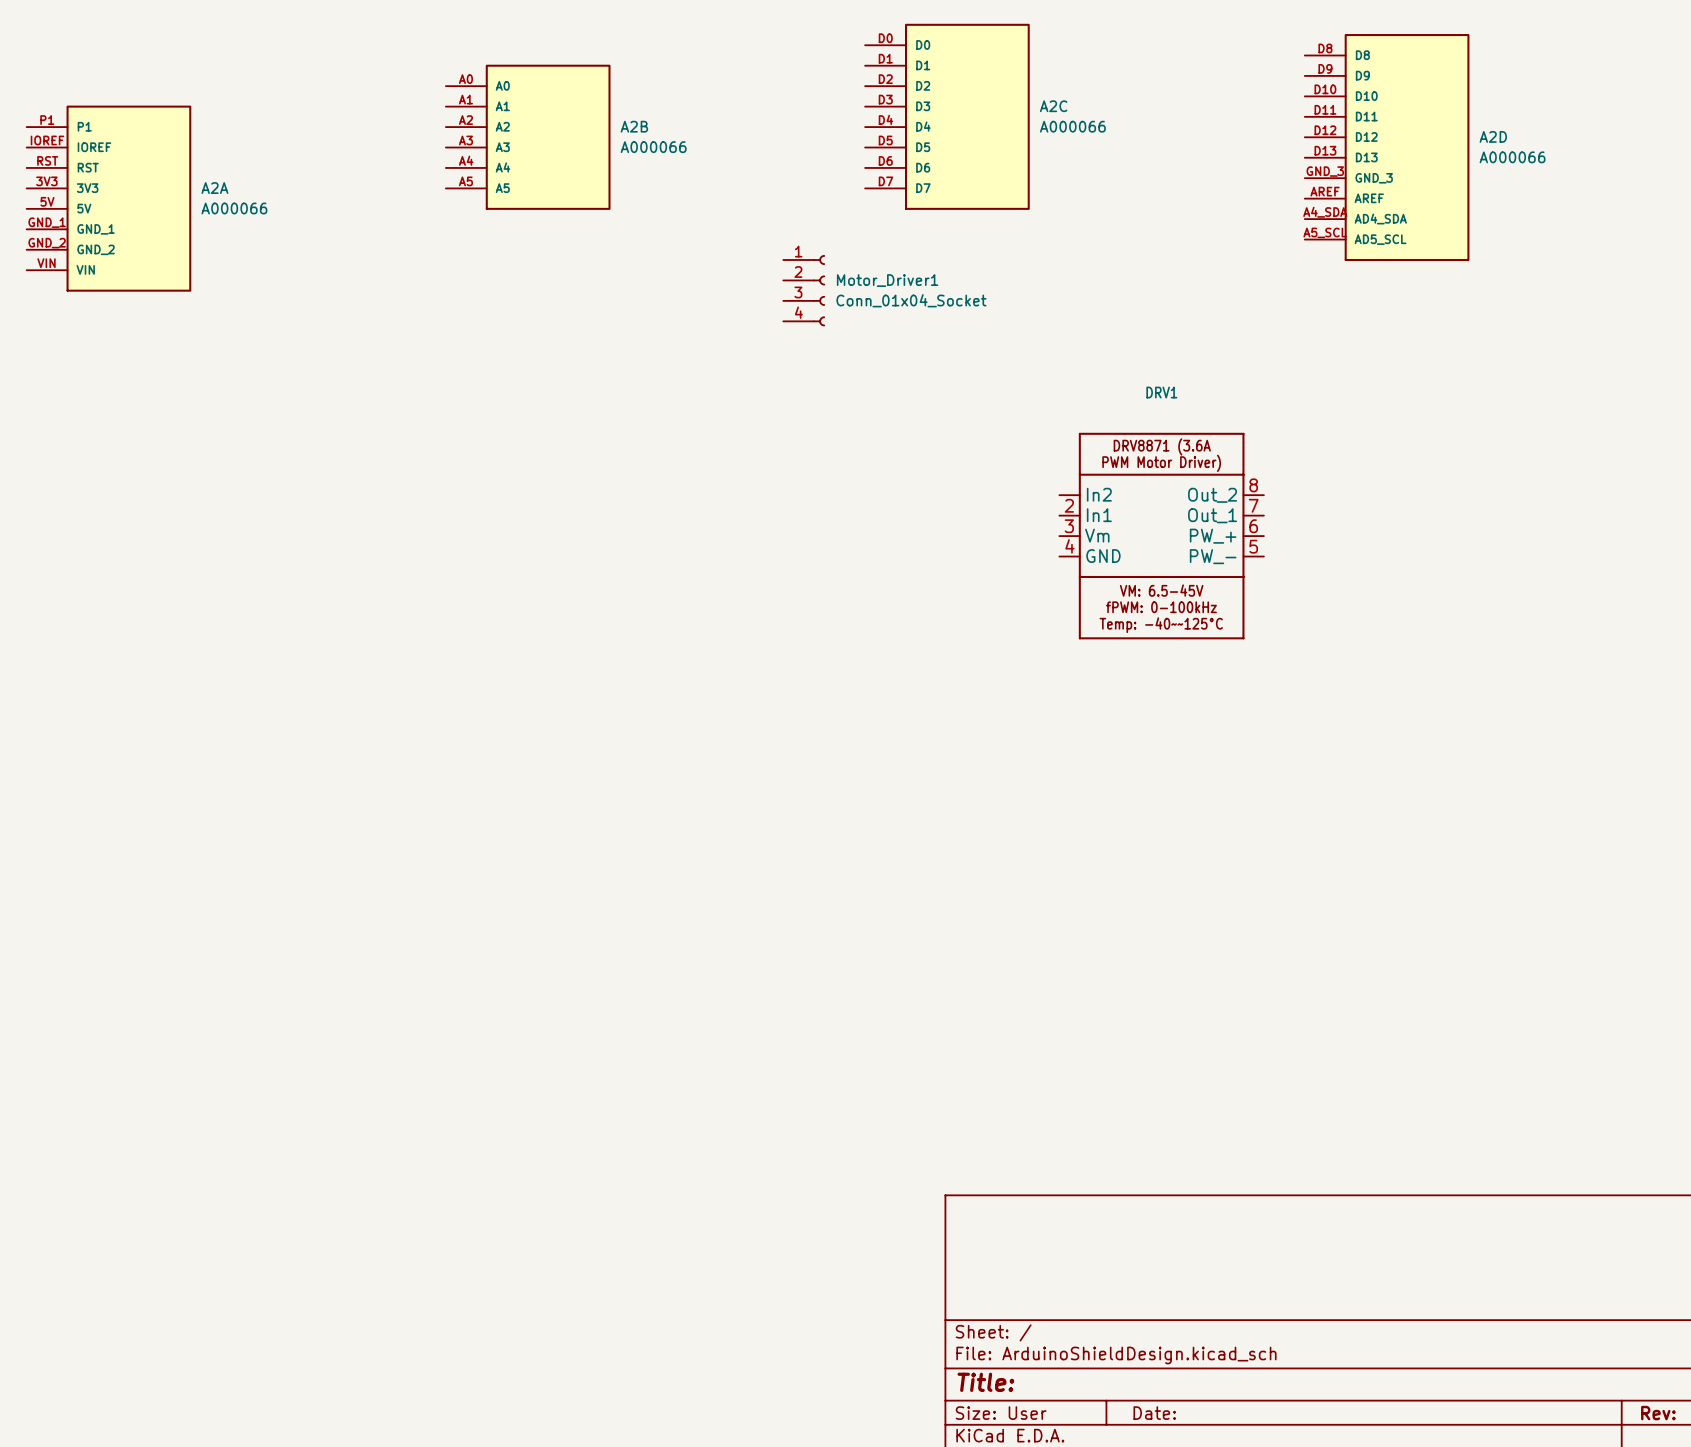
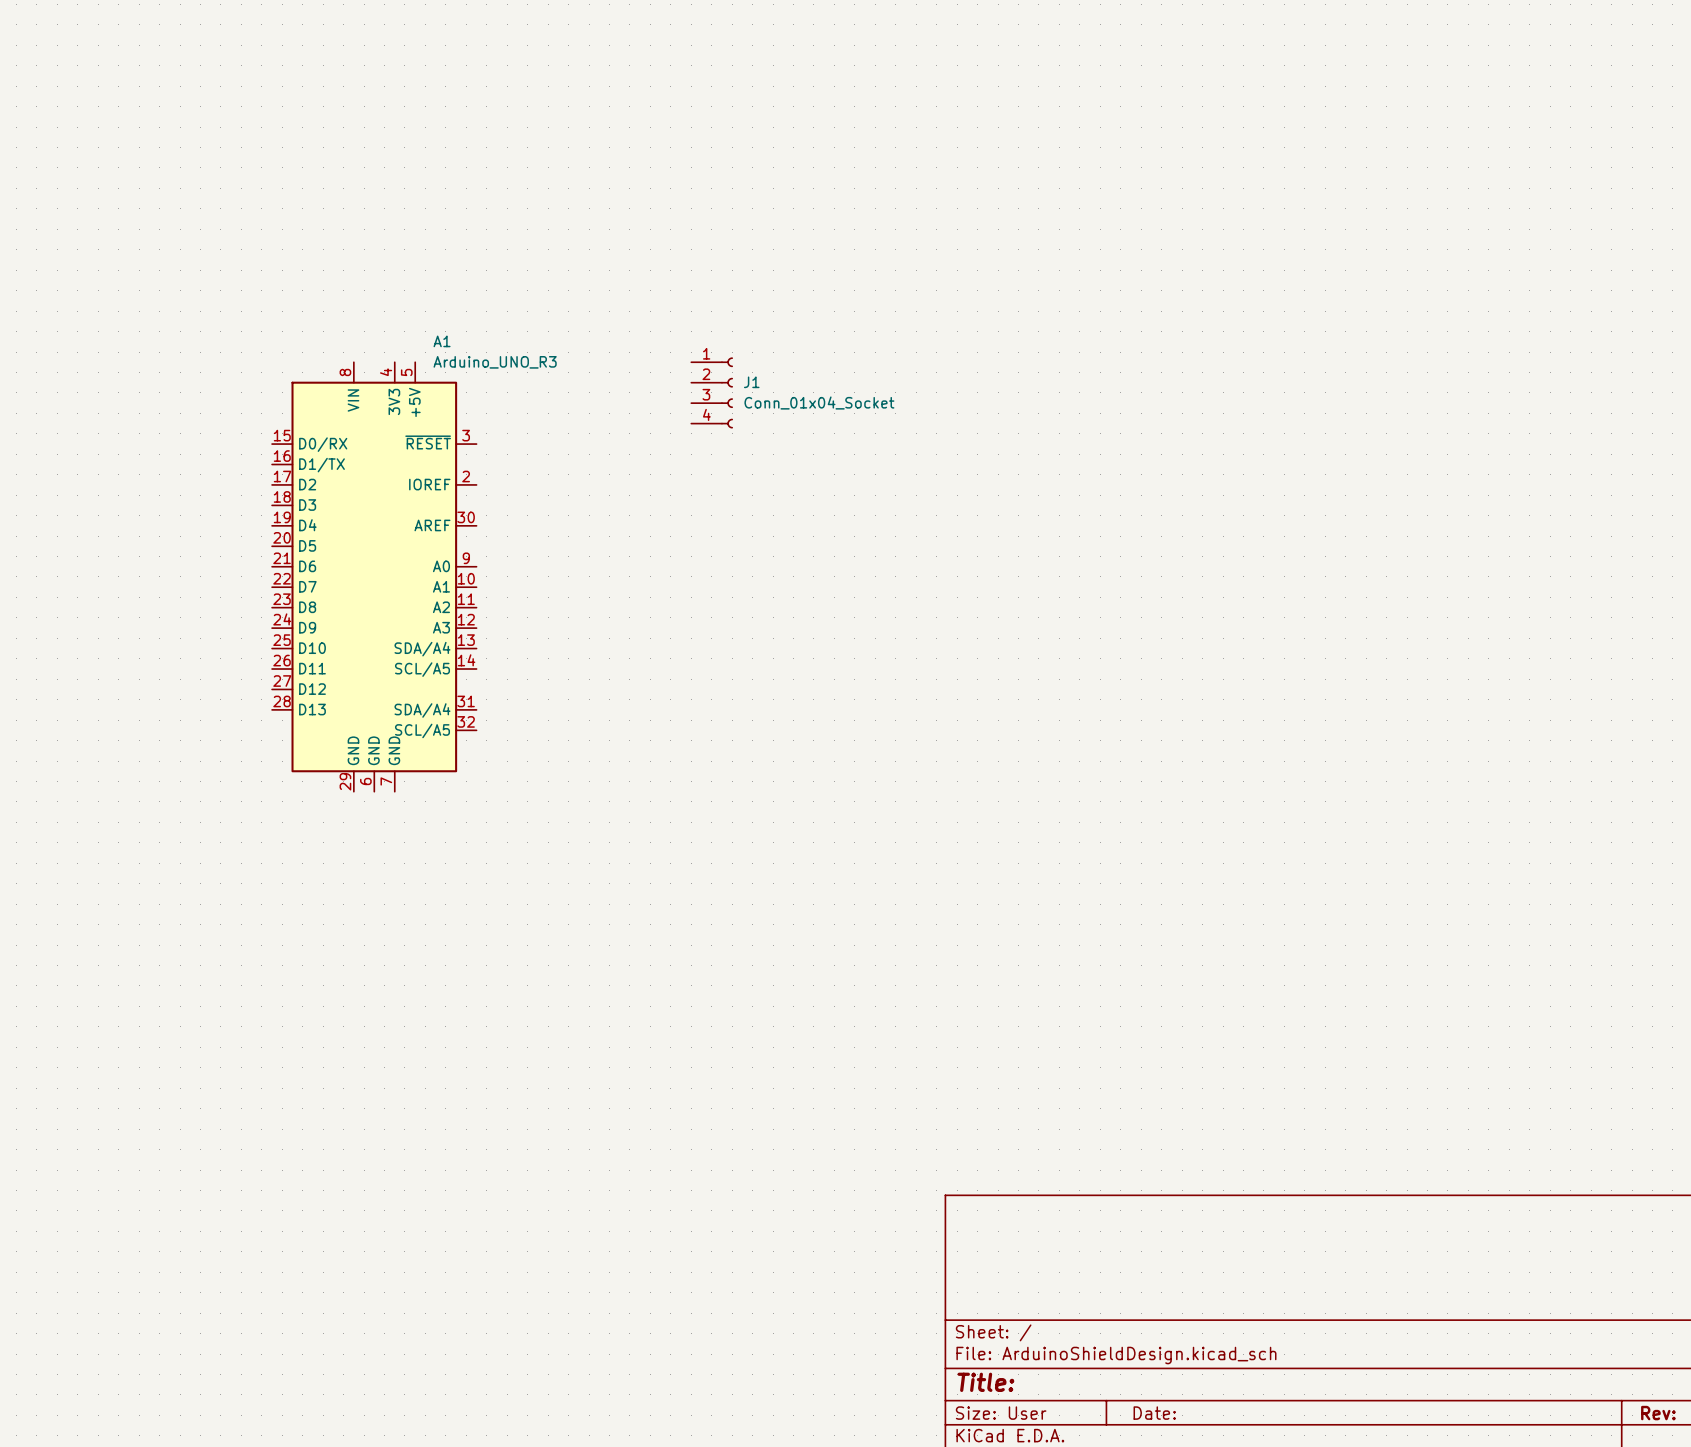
A2C: A000066 (947, 116) -> none
A2B: A000066 (528, 137) -> none
A2D: A000066 (1387, 147) -> none
A2A: A000066 (108, 198) -> none
Motor_Driver1: Conn_01x04_Socket (804, 290) -> none
J1: none -> Conn_01x04_Socket (712, 392)
DRV1: (1161, 536) -> none
A1: none -> Arduino_UNO_R3 (374, 576)

